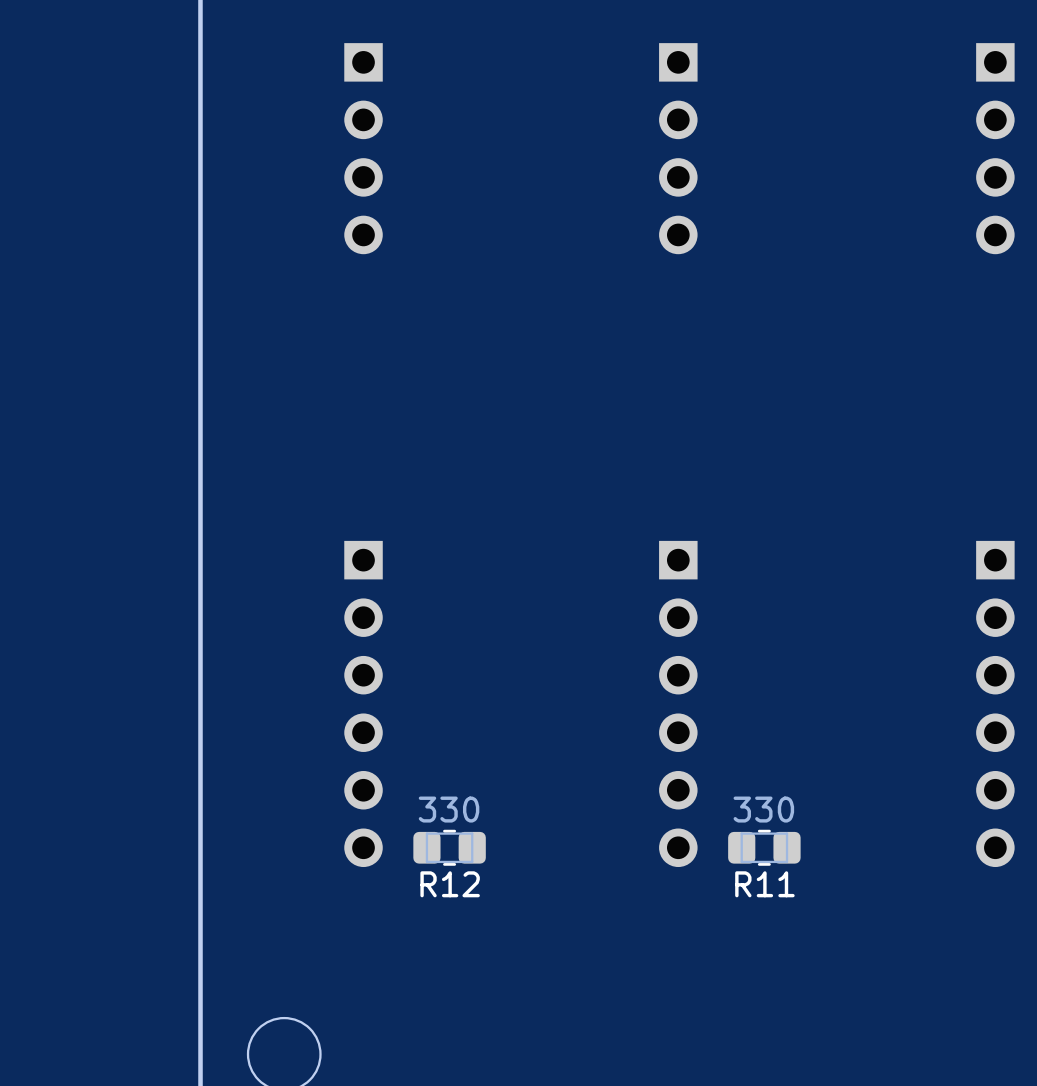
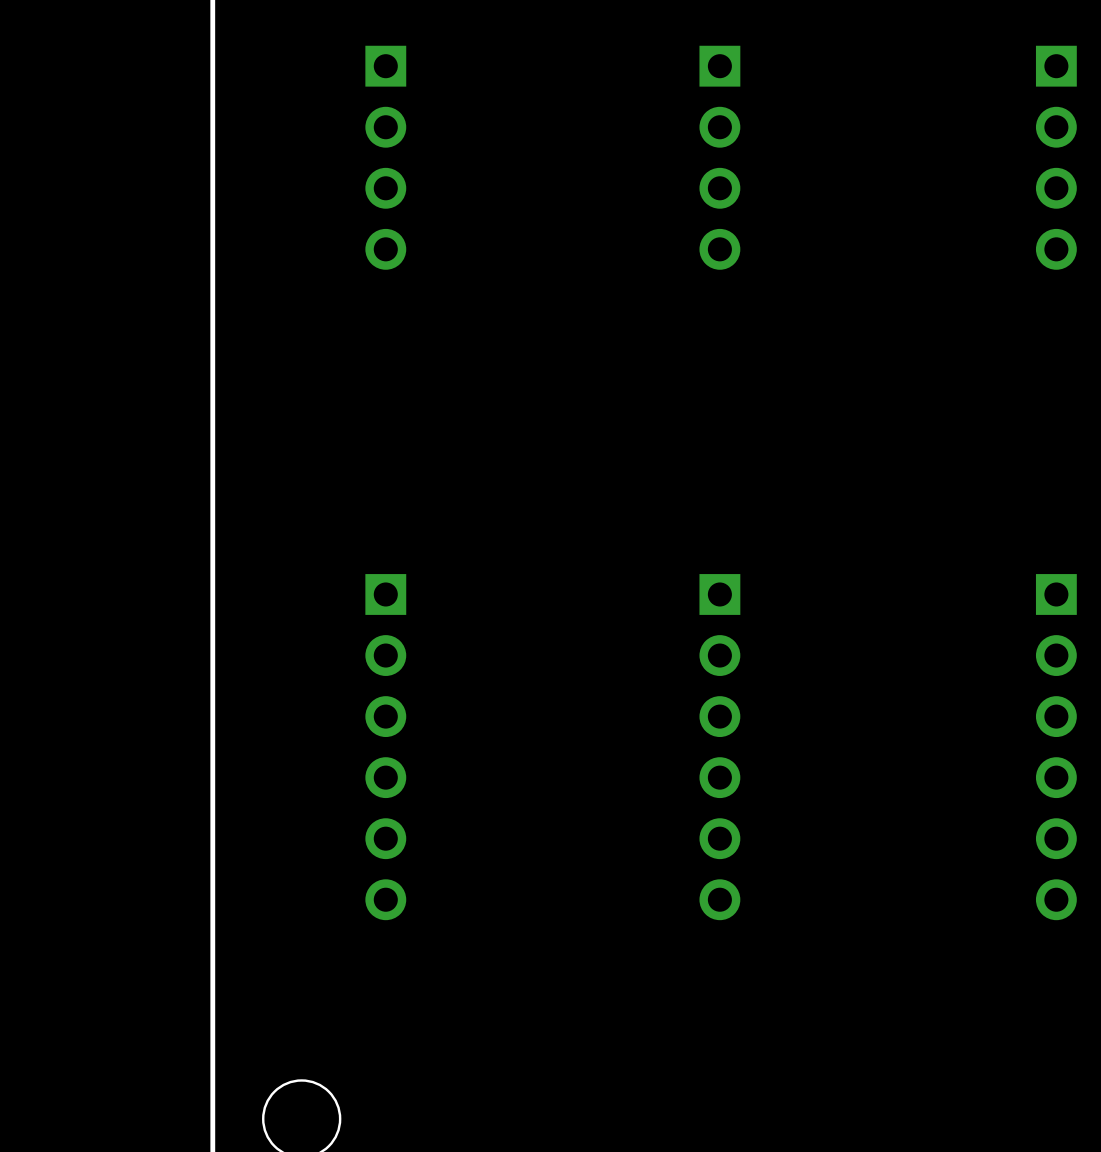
R12: 330 (449, 847) -> none
R11: 330 (764, 847) -> none

